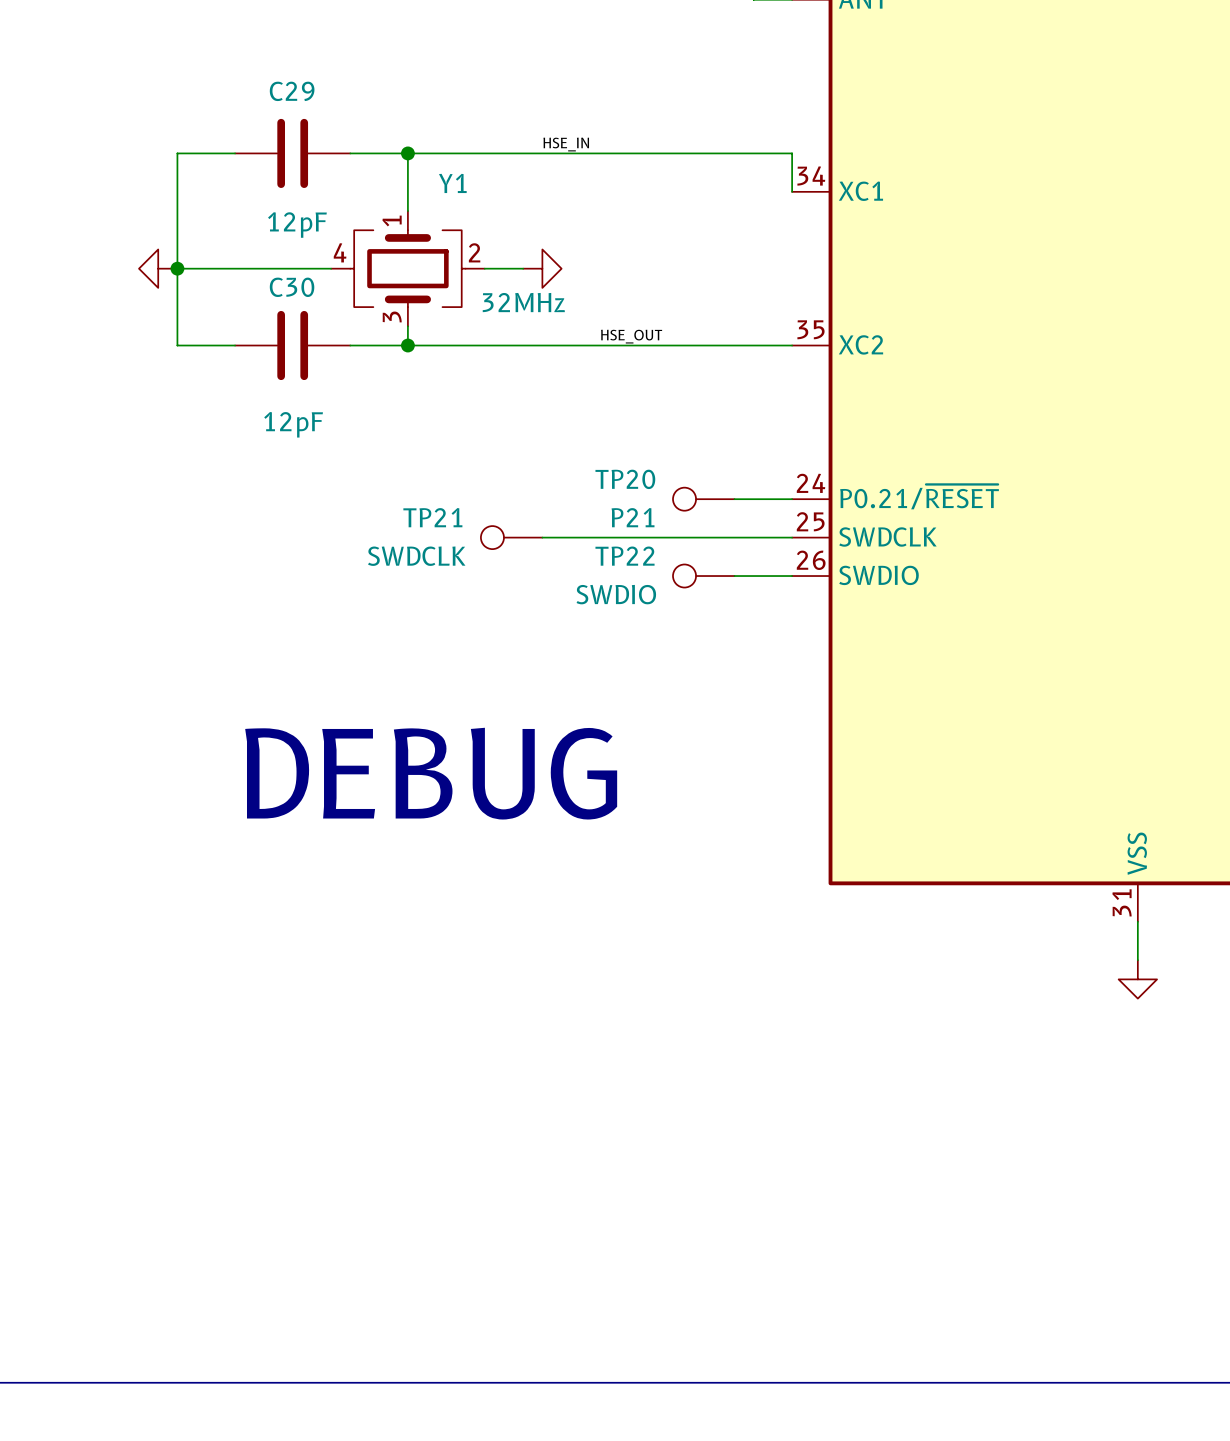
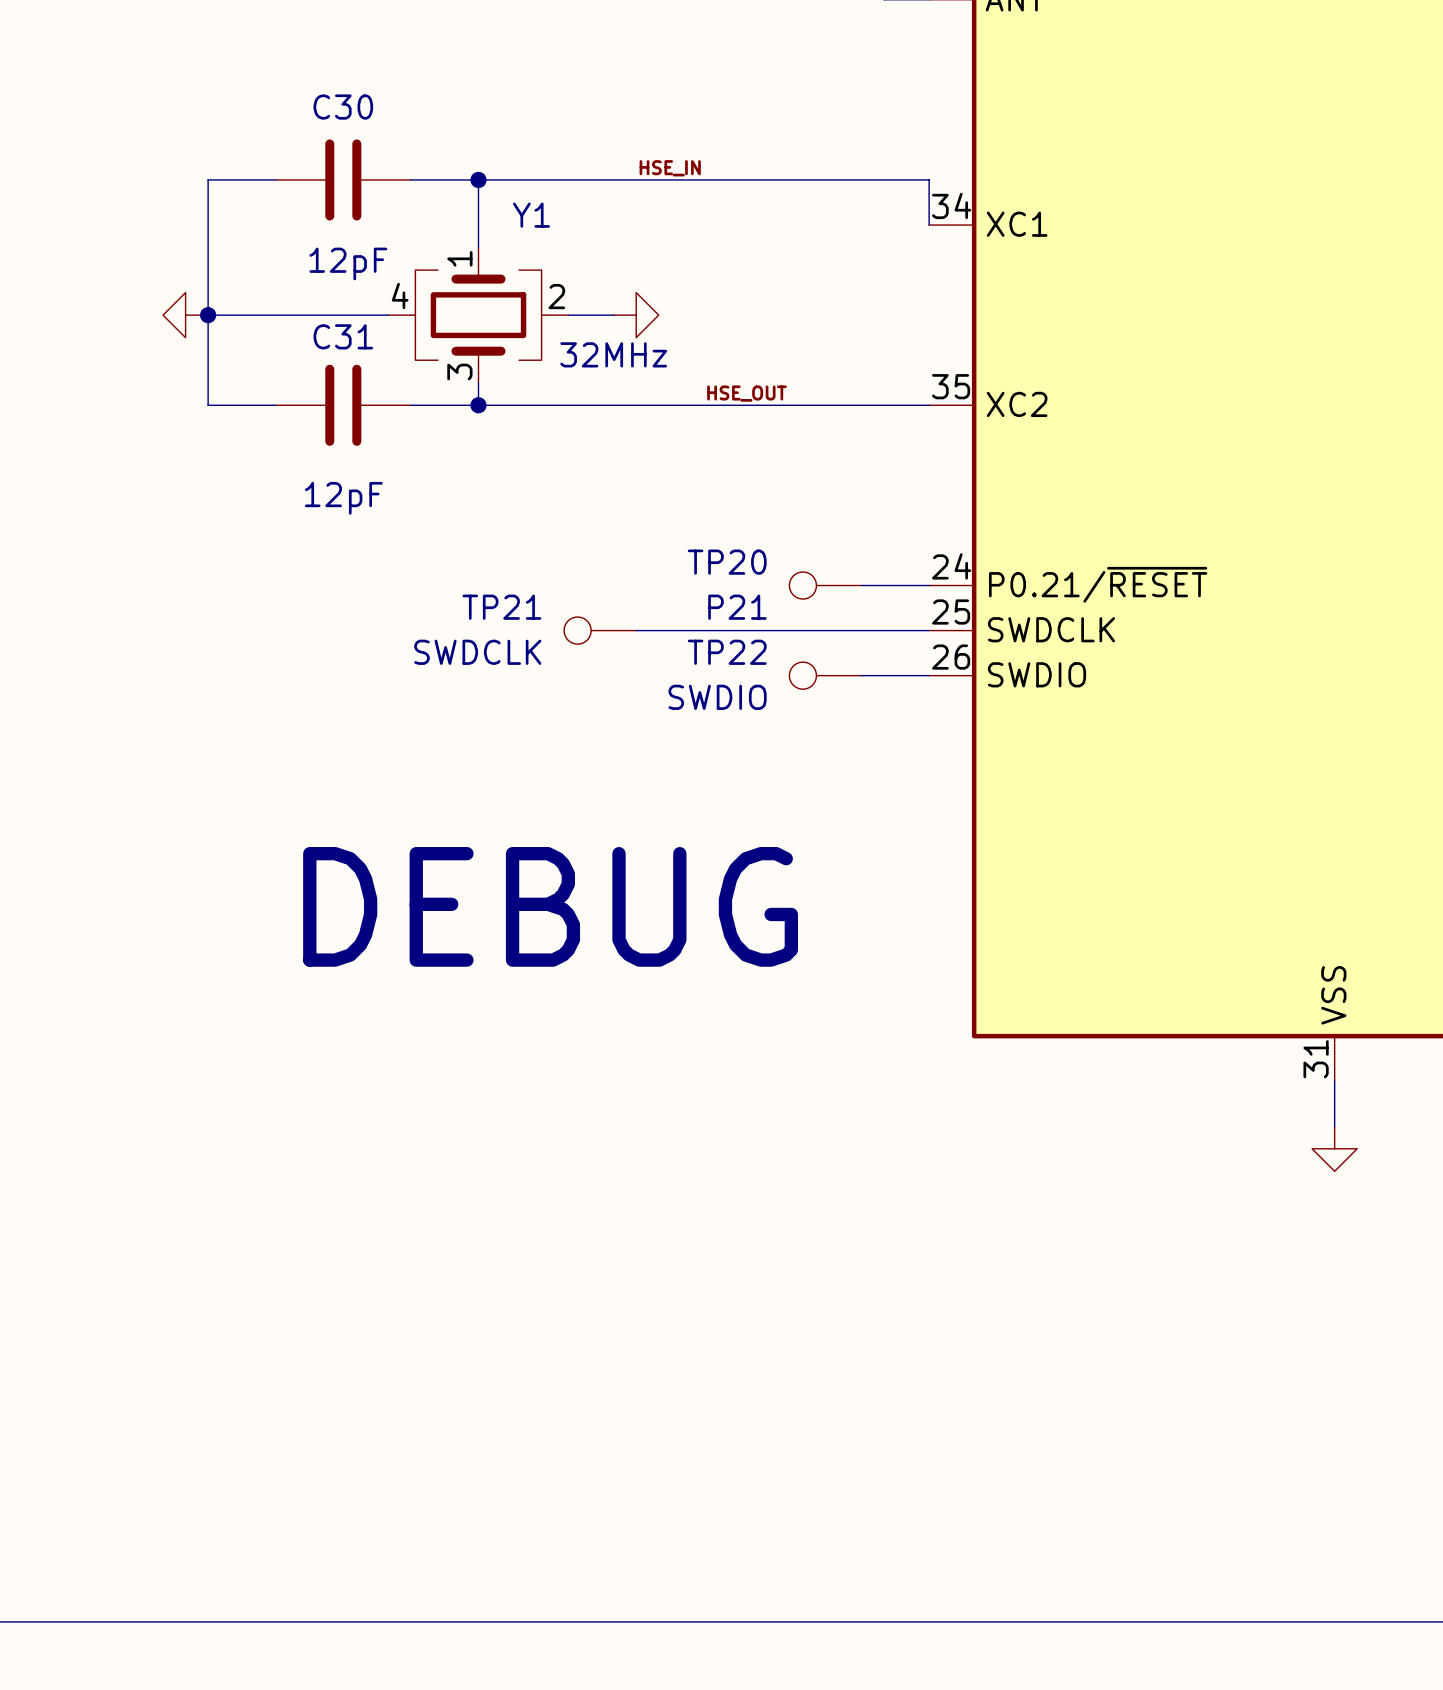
C29 name: C29 (292, 91) -> C30 (343, 107)
C30 name: C30 (292, 287) -> C31 (343, 336)

